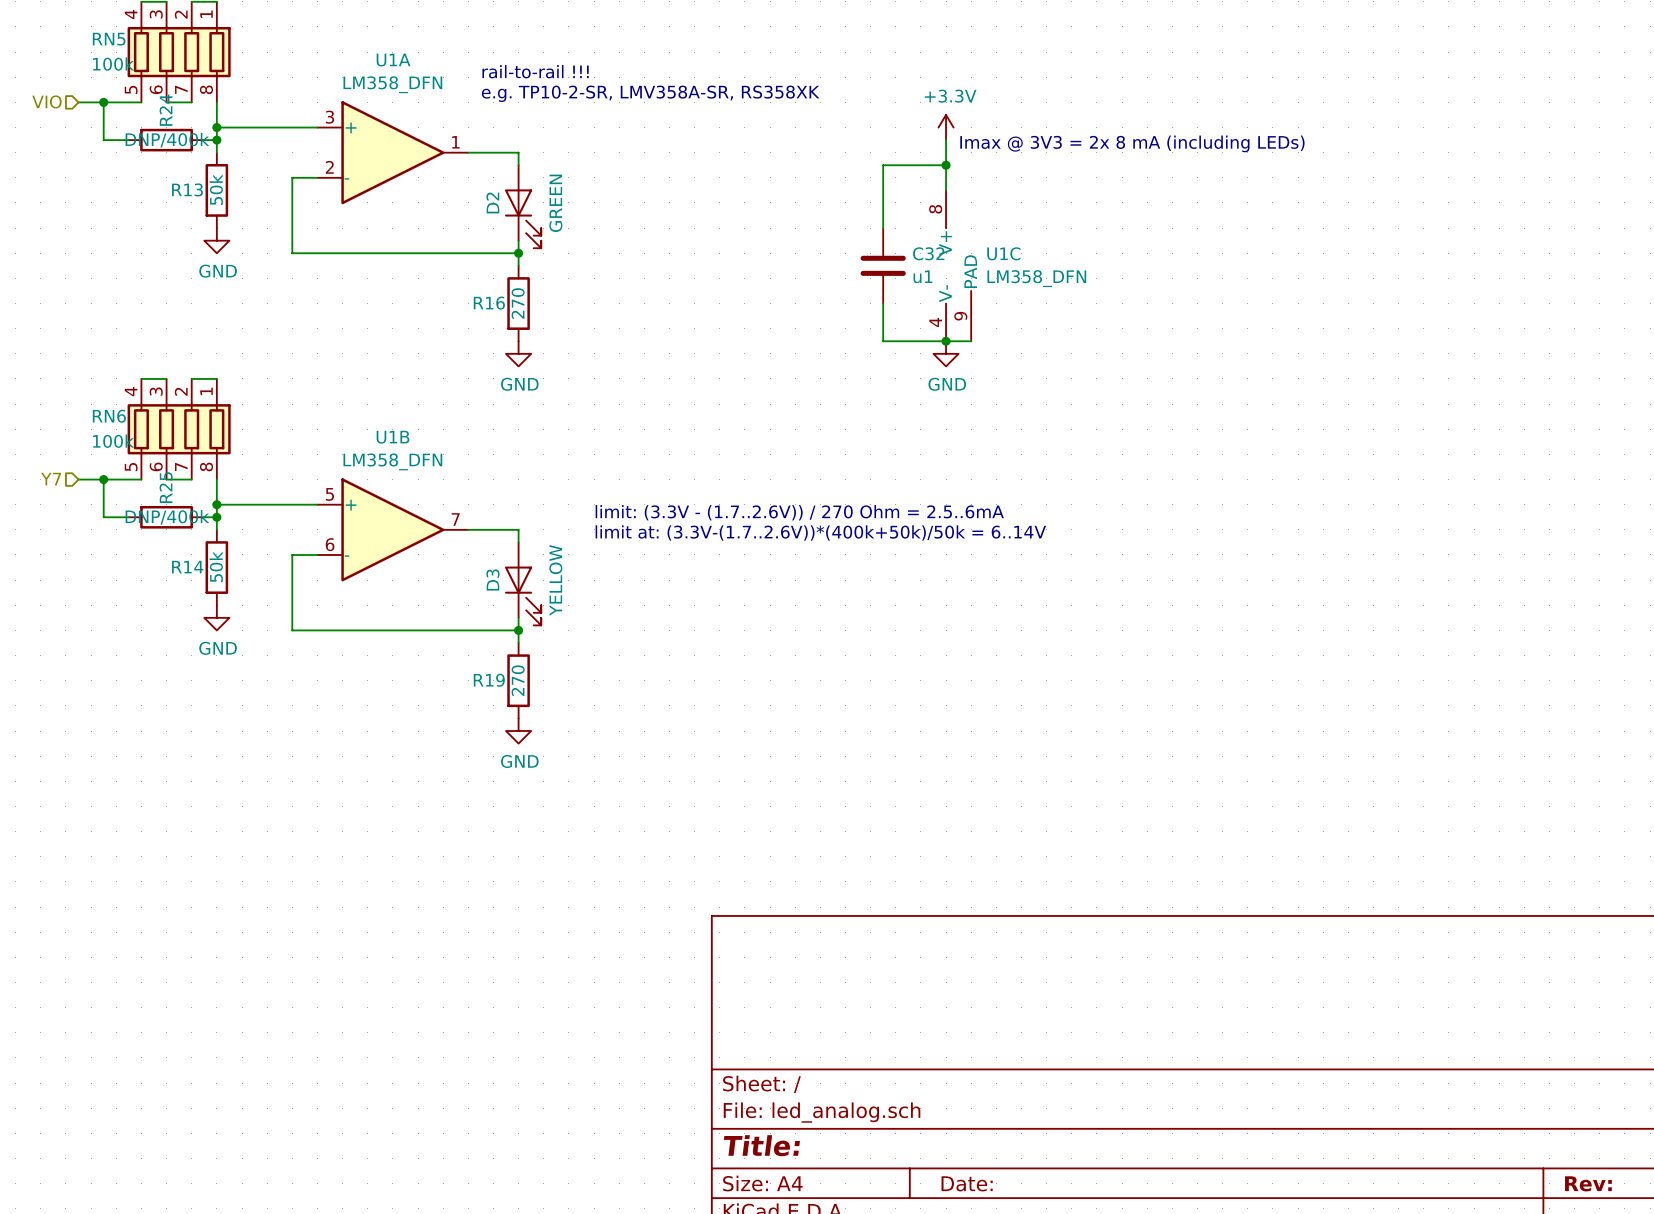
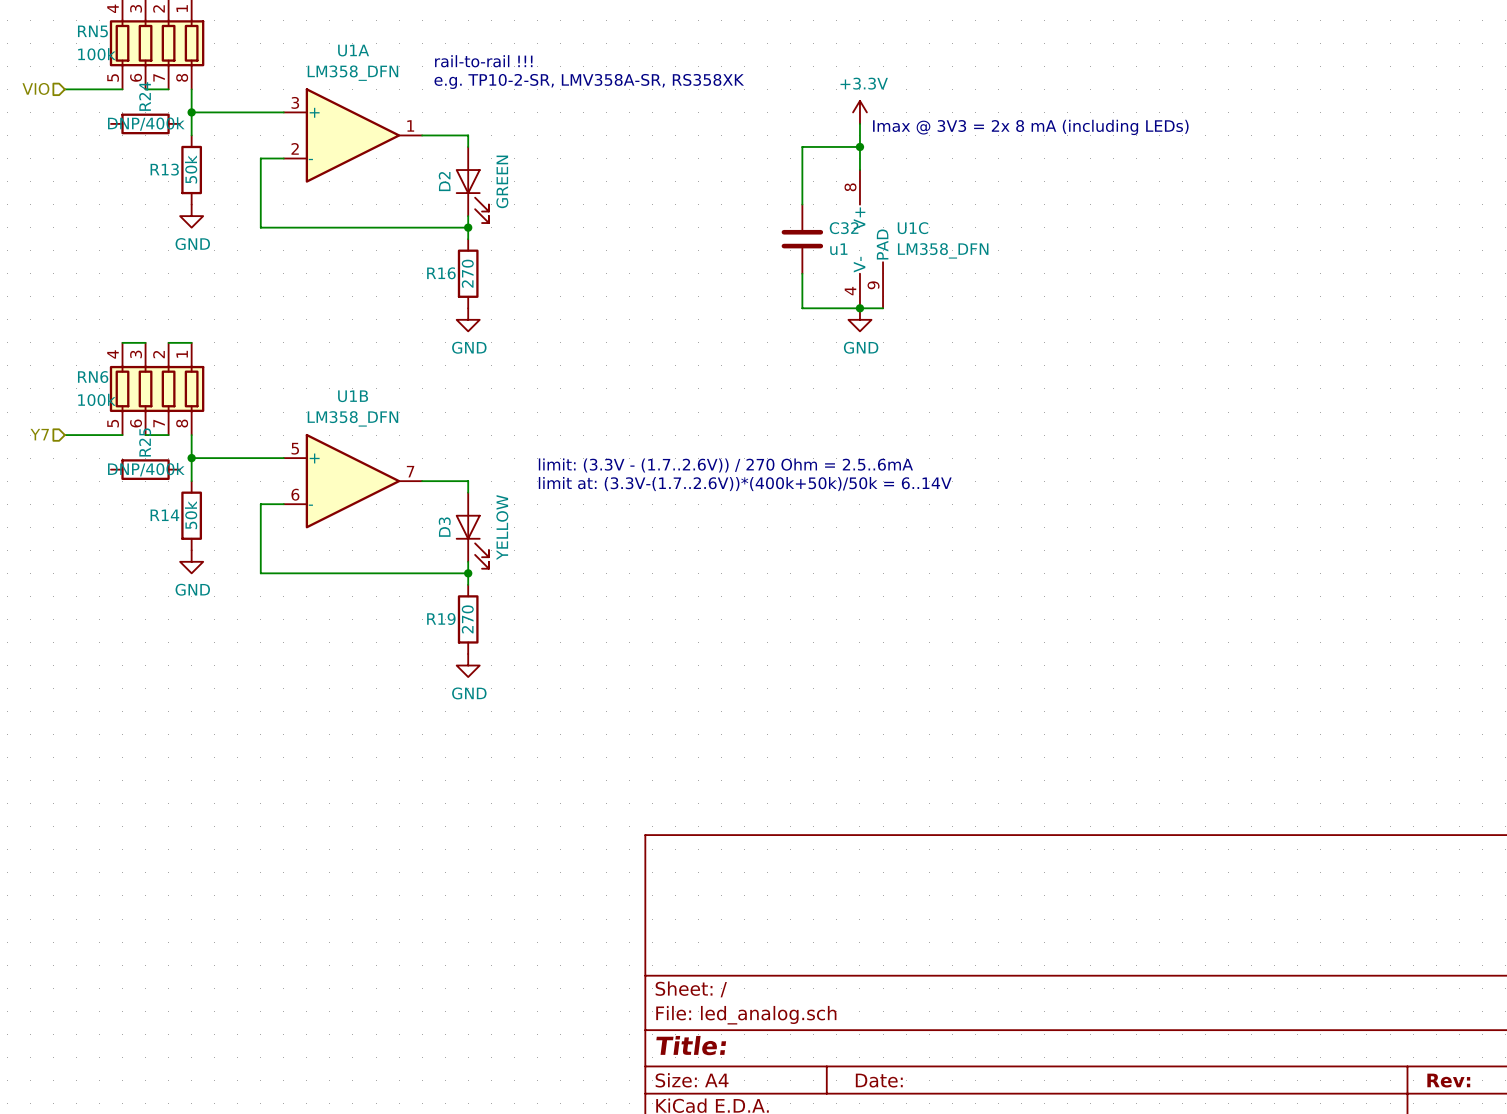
wire: (103, 102) (103, 140) (128, 140) -> none
junction: (103, 102) -> none
wire: (204, 140) (216, 140) -> none
junction: (216, 140) -> none
wire: (103, 479) (103, 517) (128, 517) -> none
junction: (103, 479) -> none
wire: (204, 517) (216, 517) -> none
junction: (216, 517) -> none

